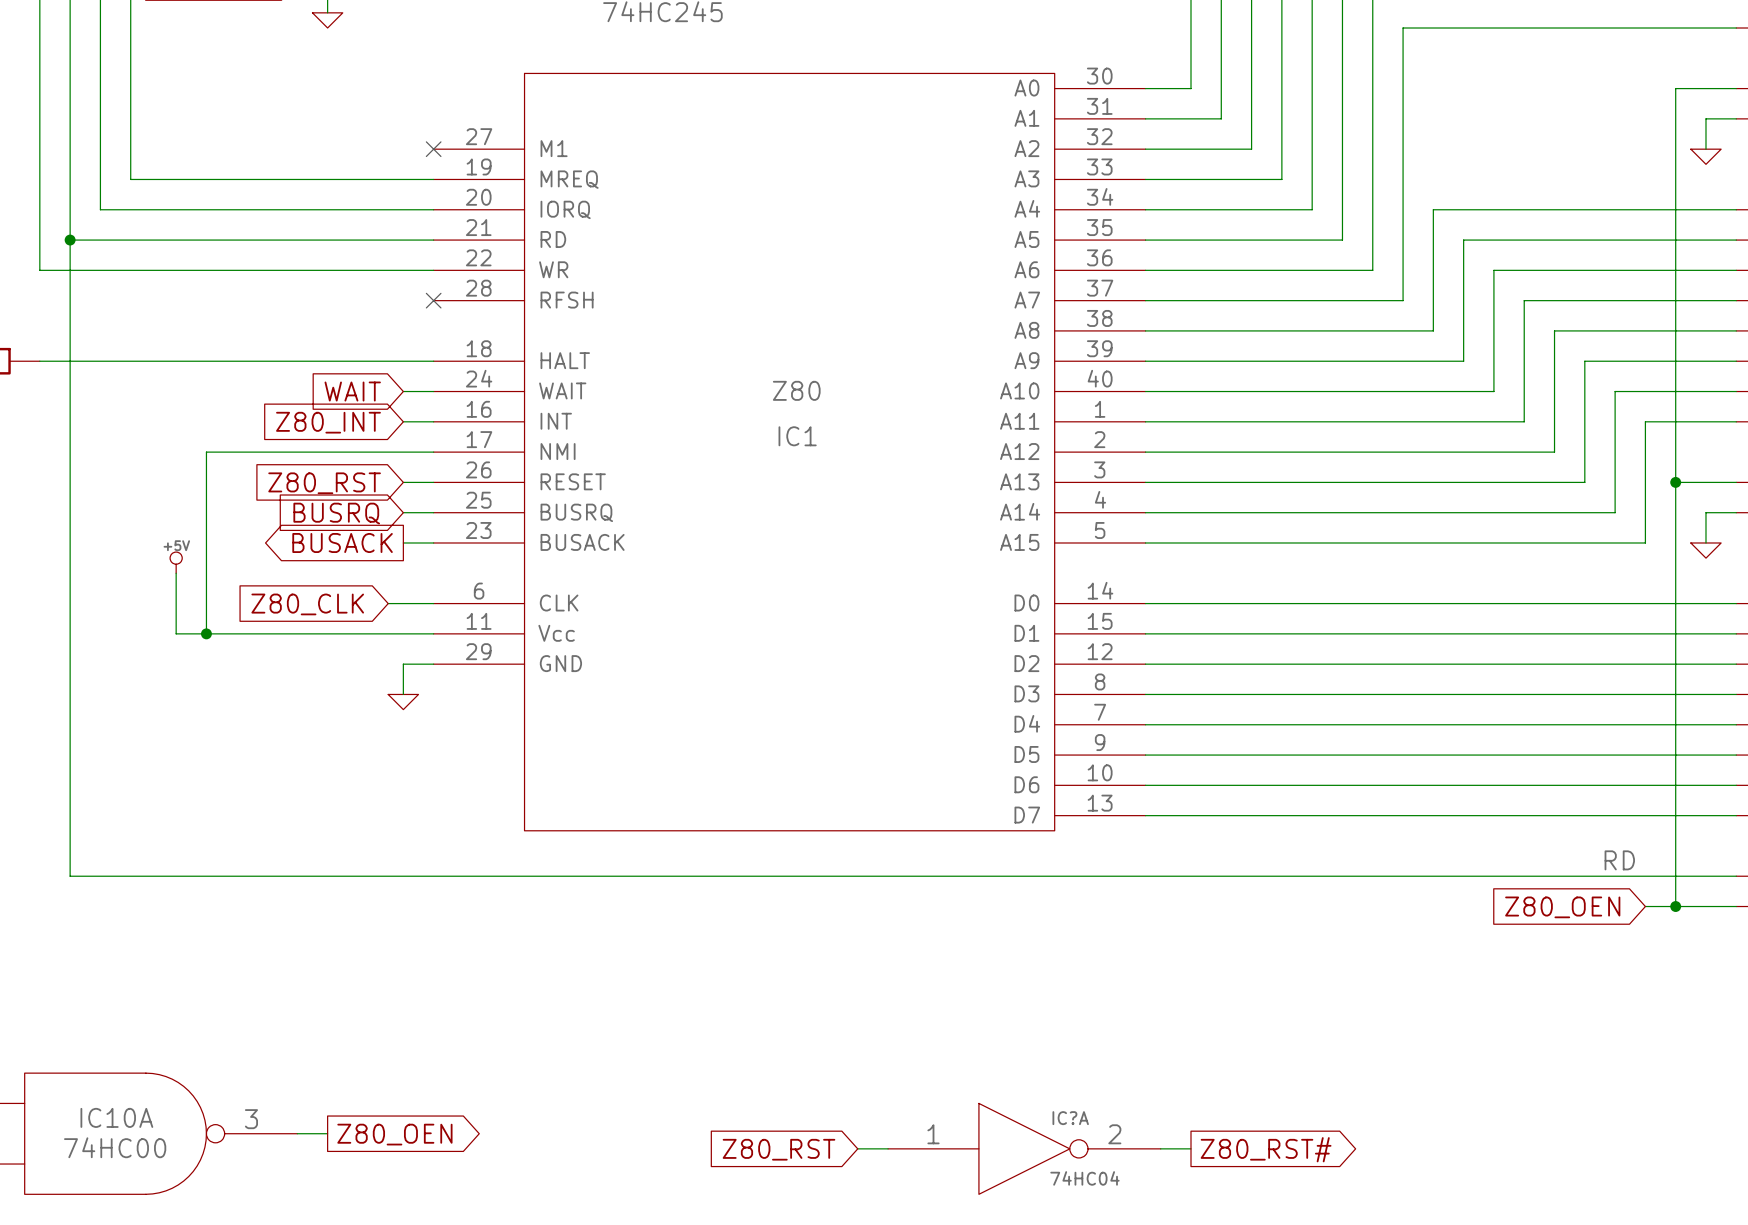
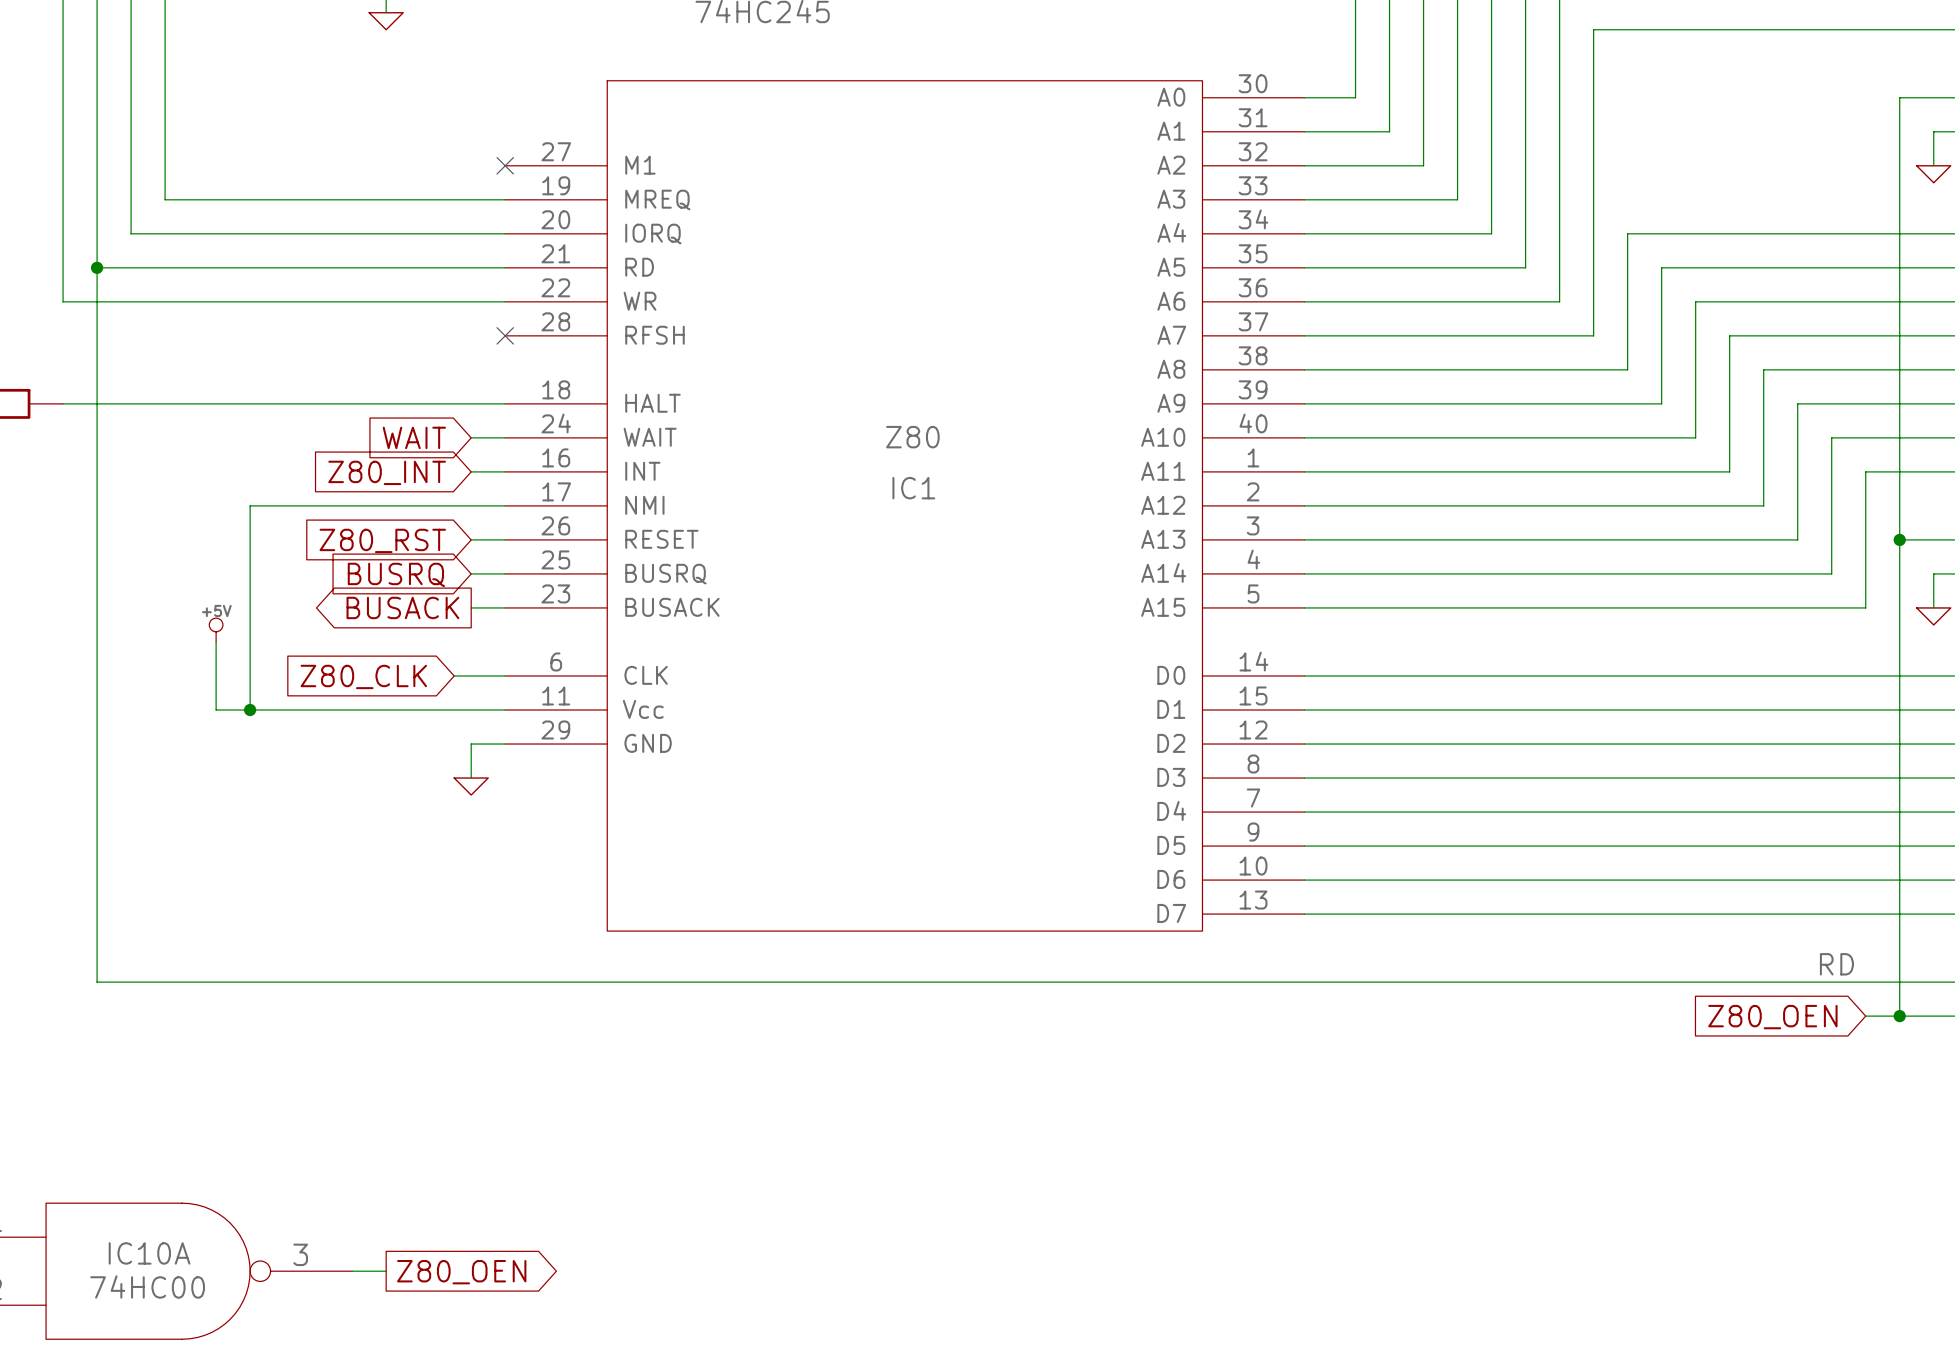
wire: (857, 1148) (888, 1148) -> none
IC?A: 74HC04 (1024, 1148) -> none
wire: (1160, 1148) (1191, 1148) -> none
global label: Z80_RST (778, 1149) -> none
global label: Z80_RST# (1266, 1149) -> none

